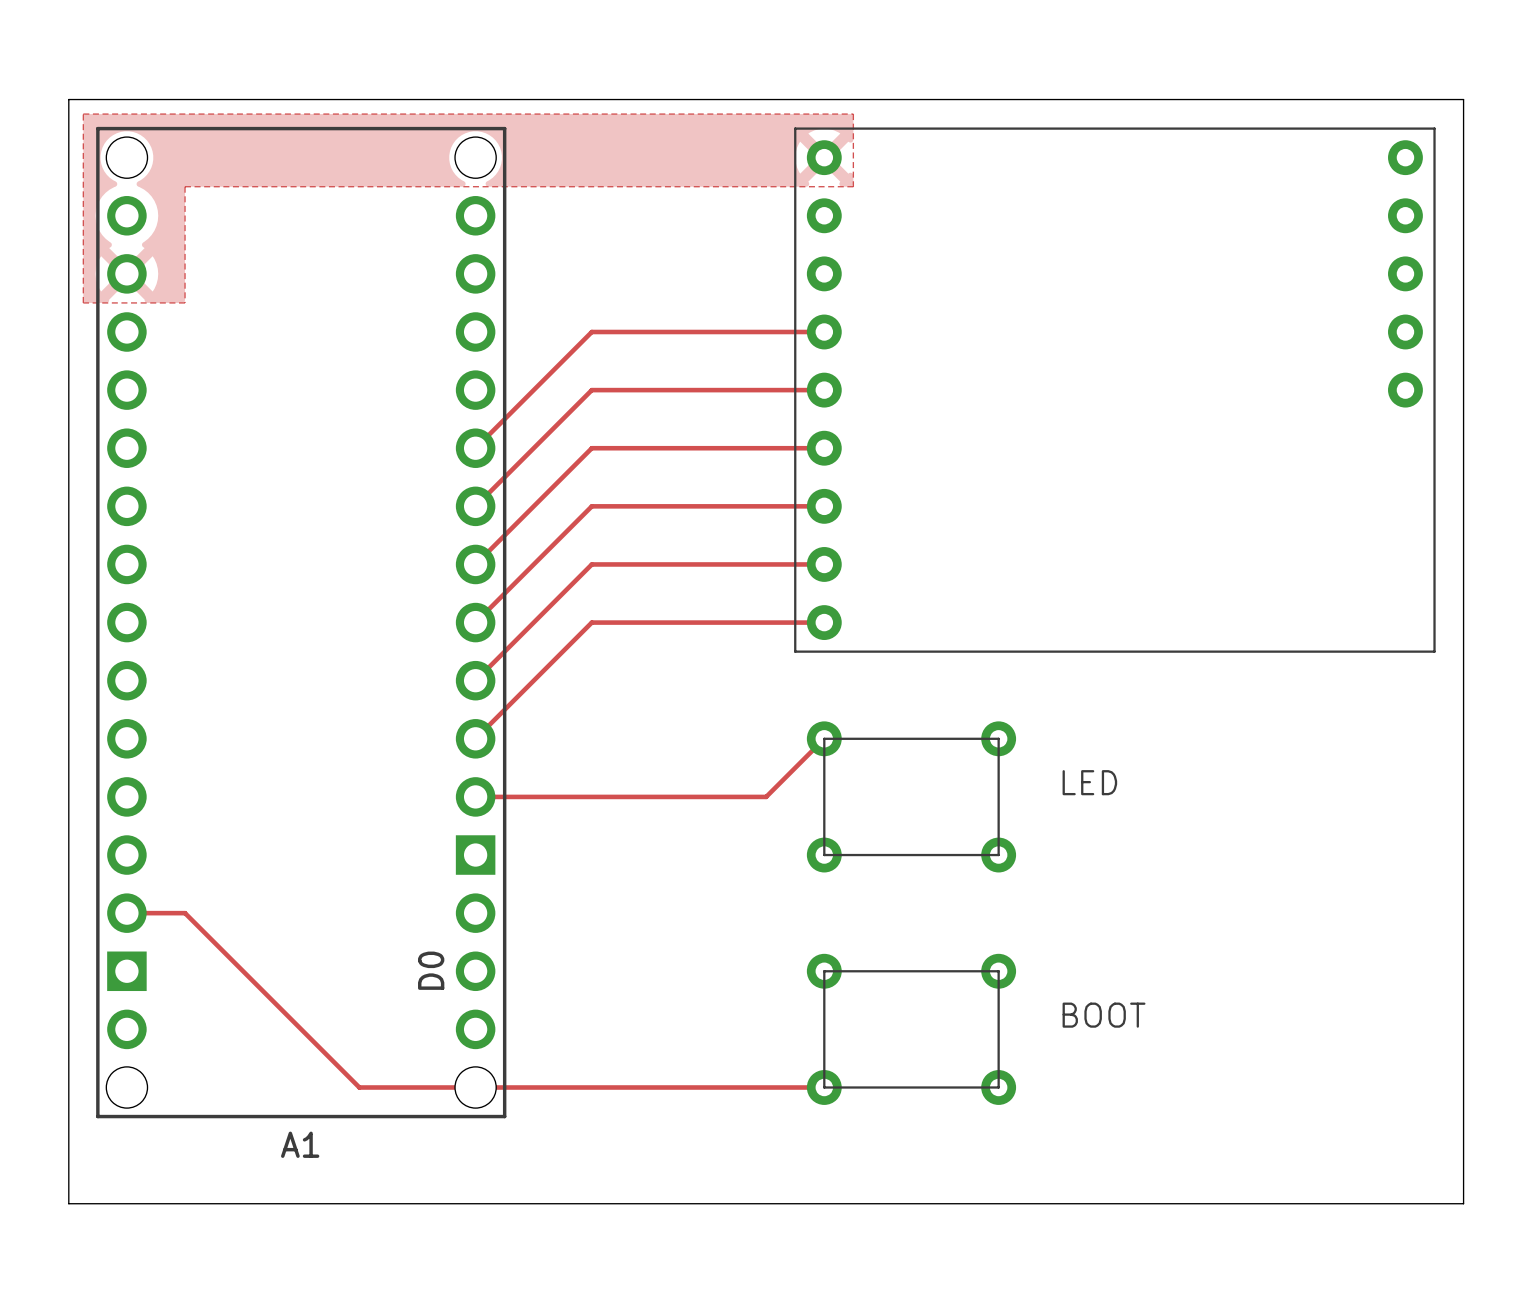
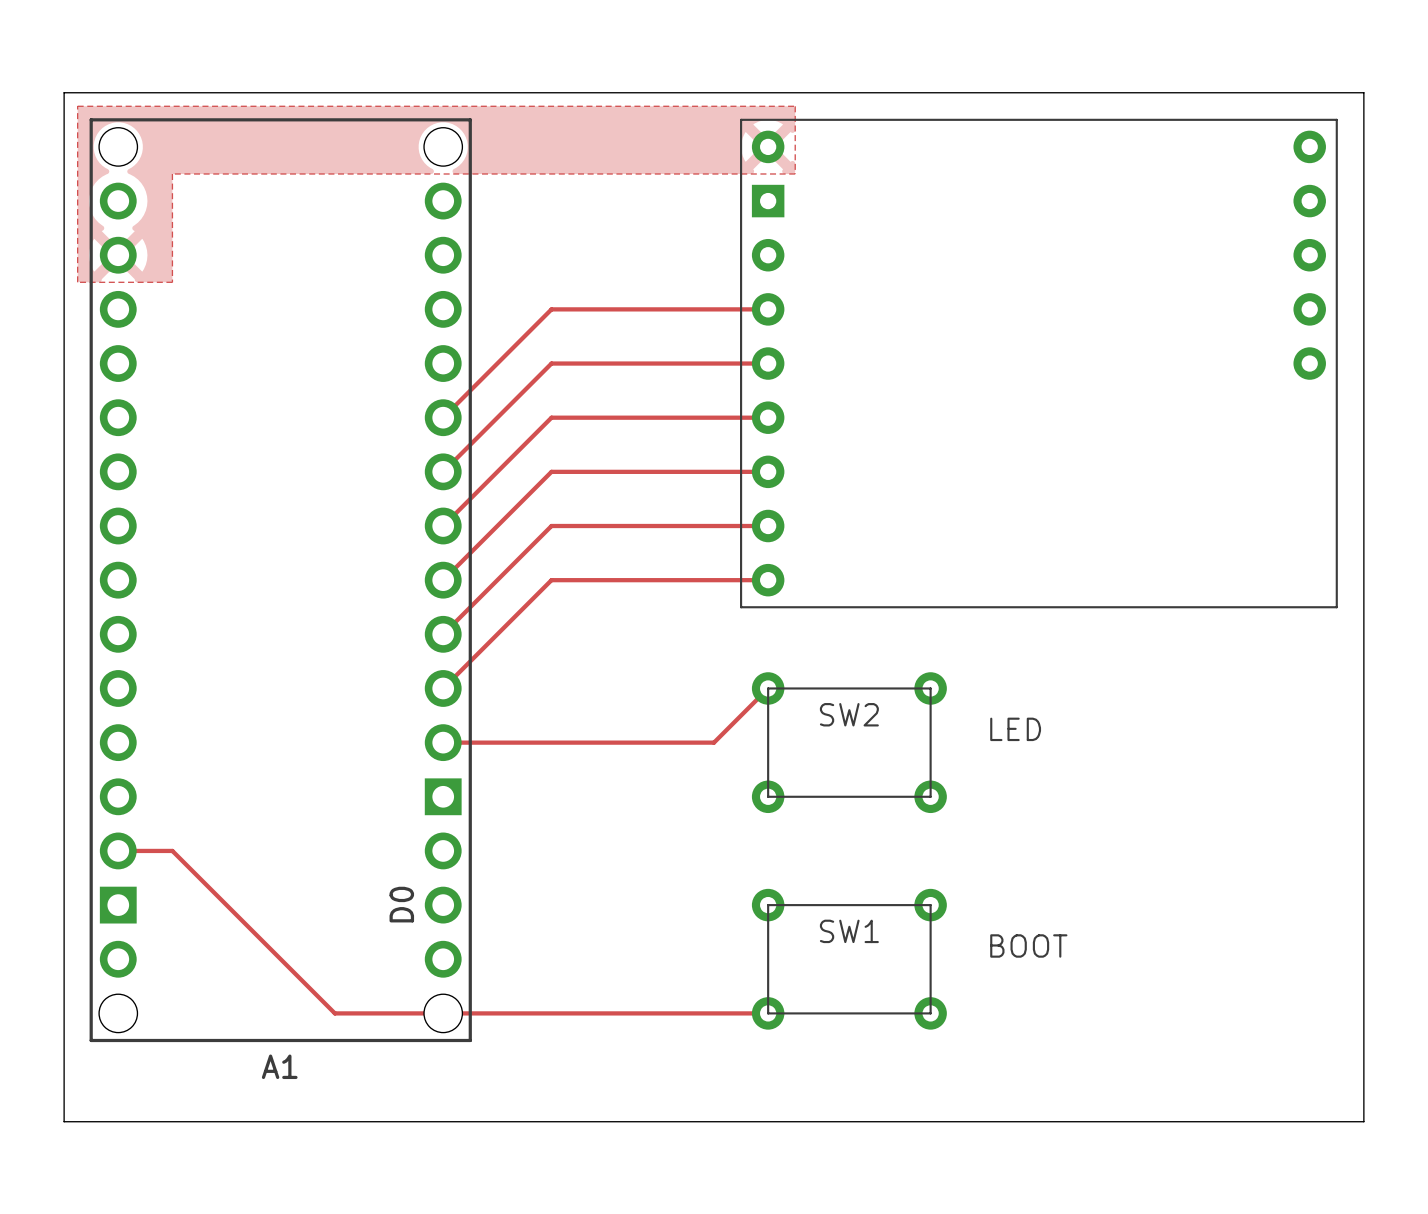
part footprint: [794, 127, 1436, 653] -> [740, 118, 1338, 609]
SW2 name: none -> SW2 (849, 714)
SW1 name: none -> SW1 (849, 931)

